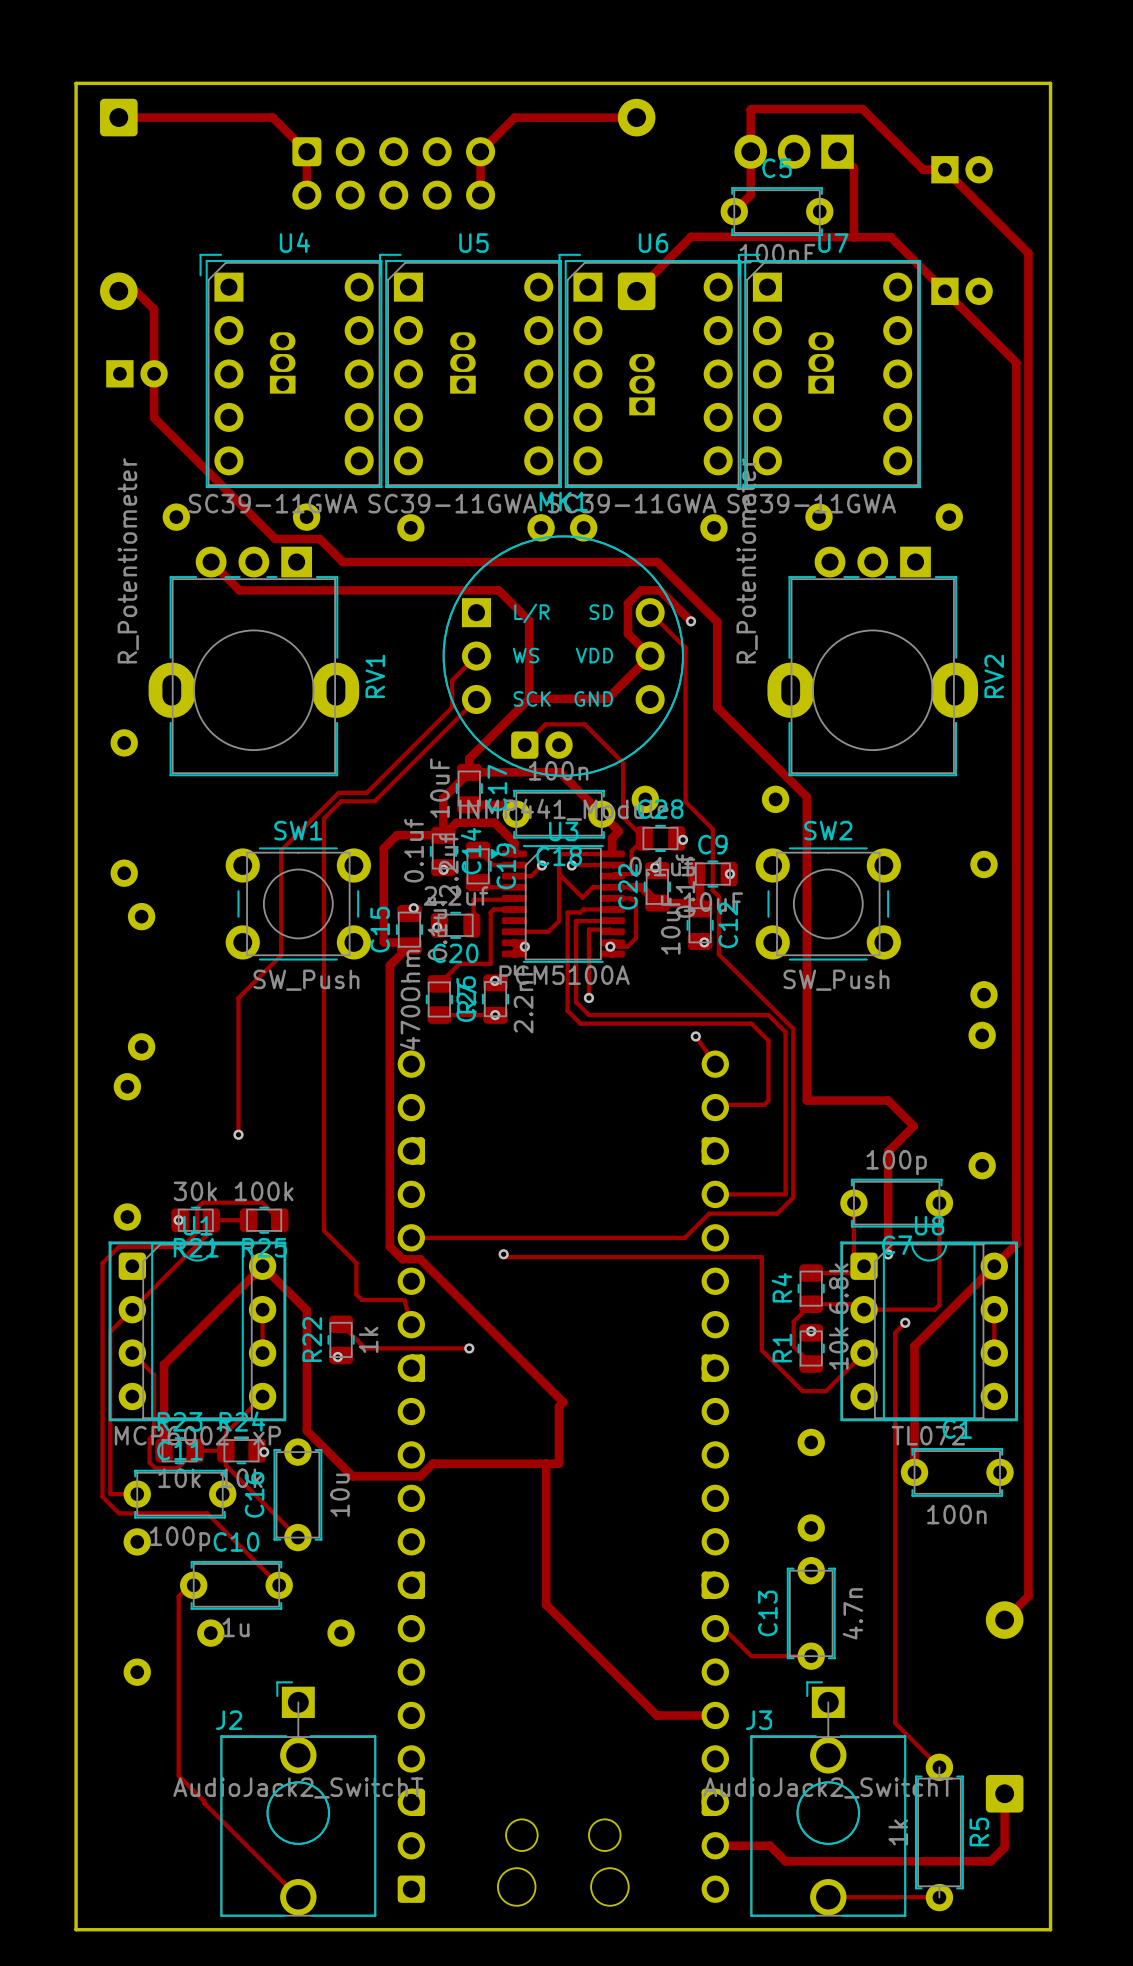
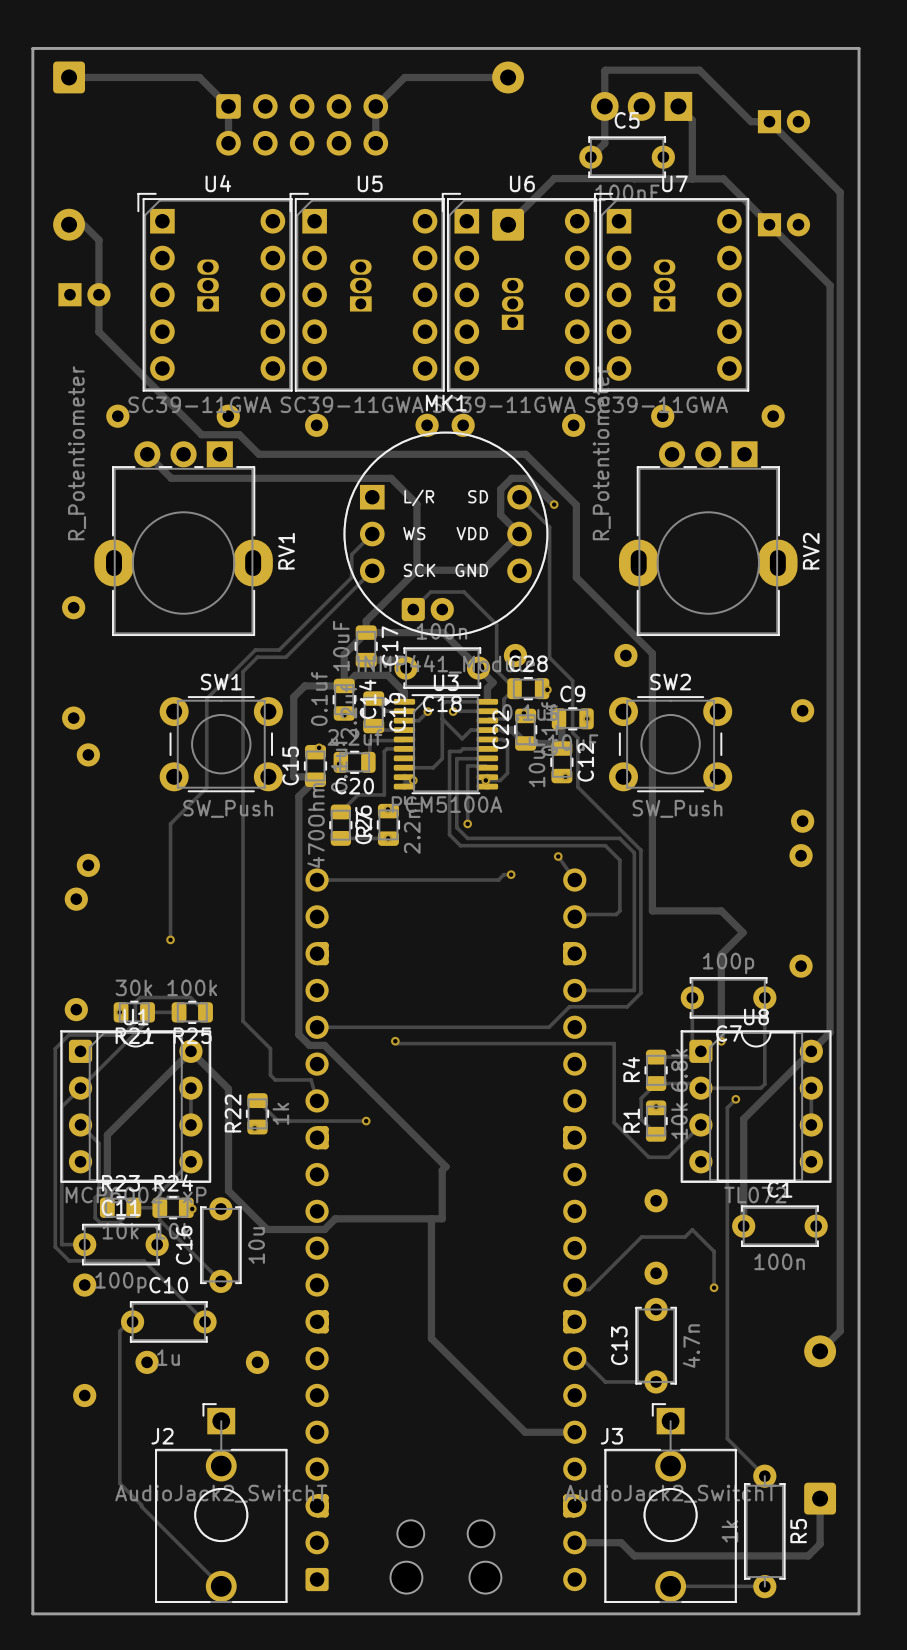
track: none -> (511, 874) (503, 874) (498, 880) (317, 880)
via: none -> (511, 874)
track: none -> (574, 1284) (579, 1289) (589, 1289) (641, 1237) (685, 1237) (692, 1229) (714, 1251) (714, 1287)
via: none -> (714, 1287)

